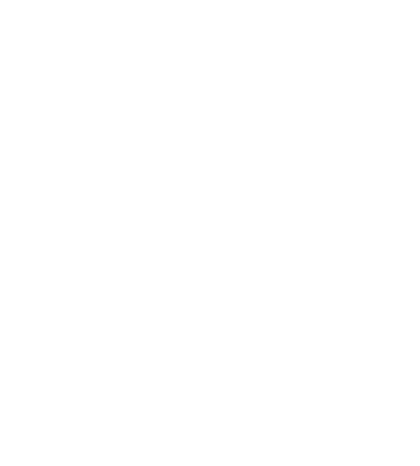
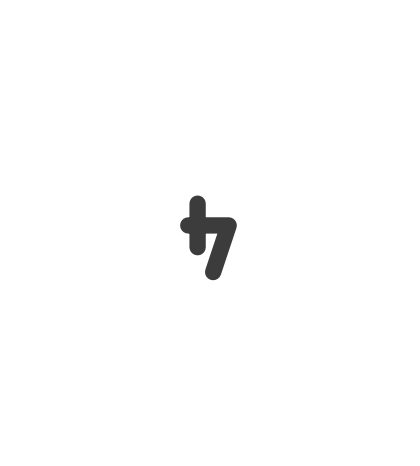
text: none -> 4 (208, 237)

